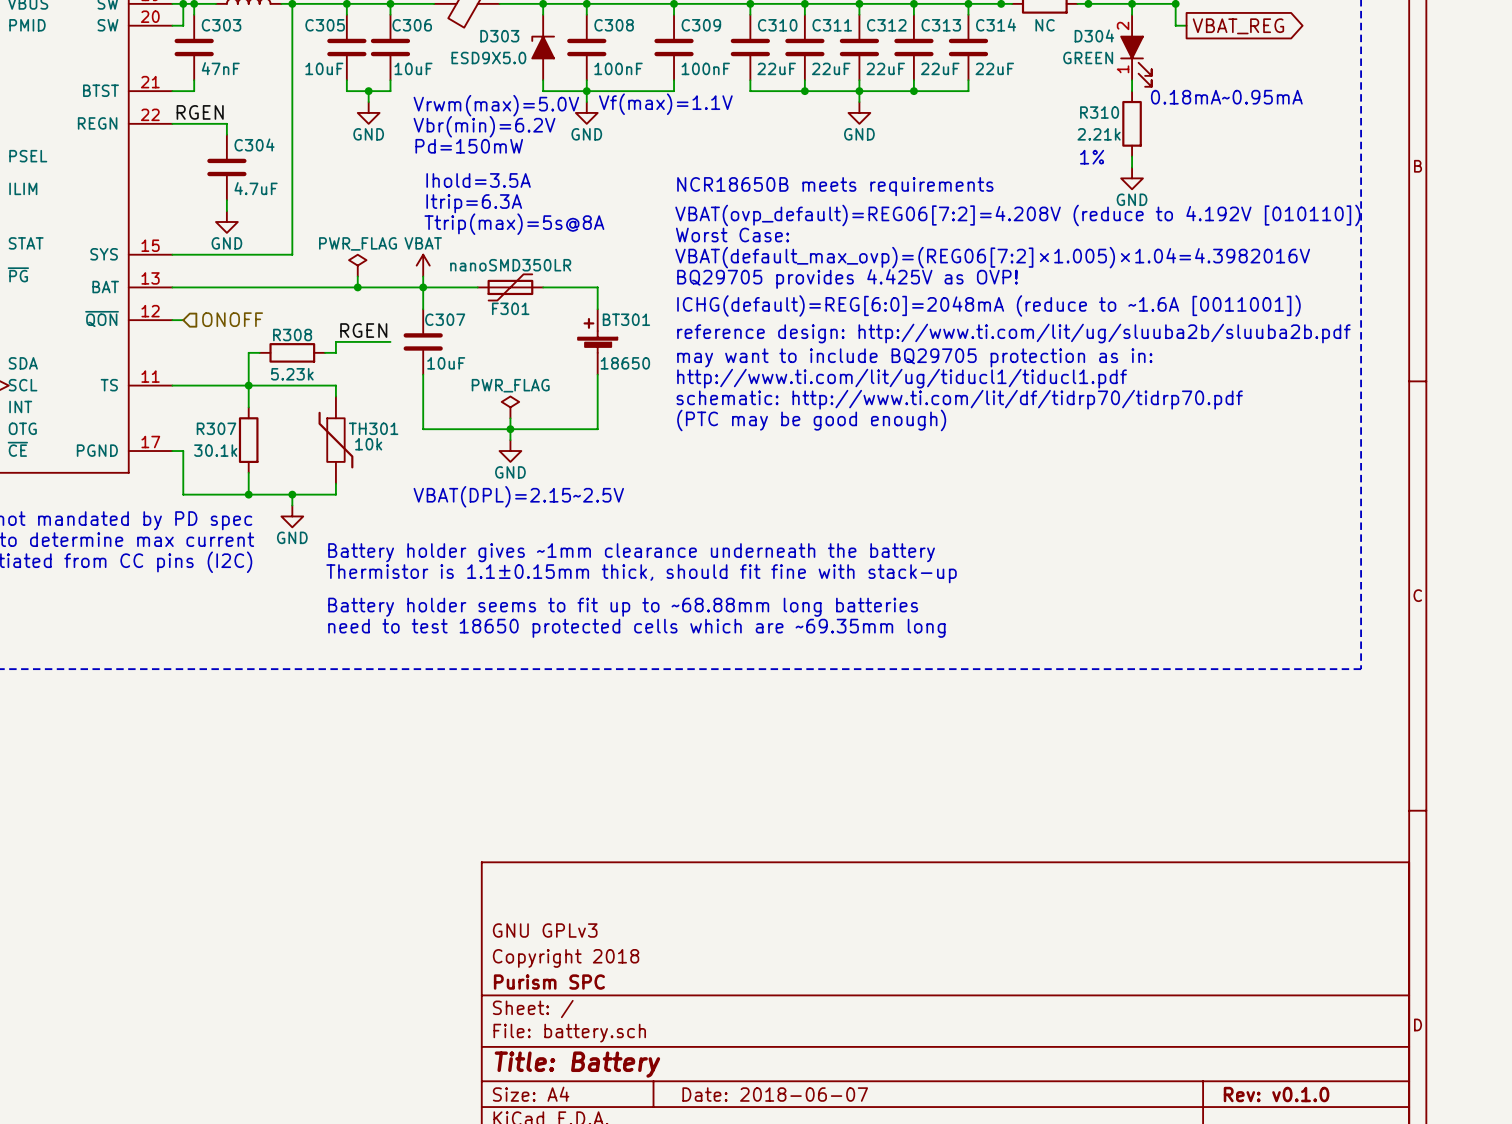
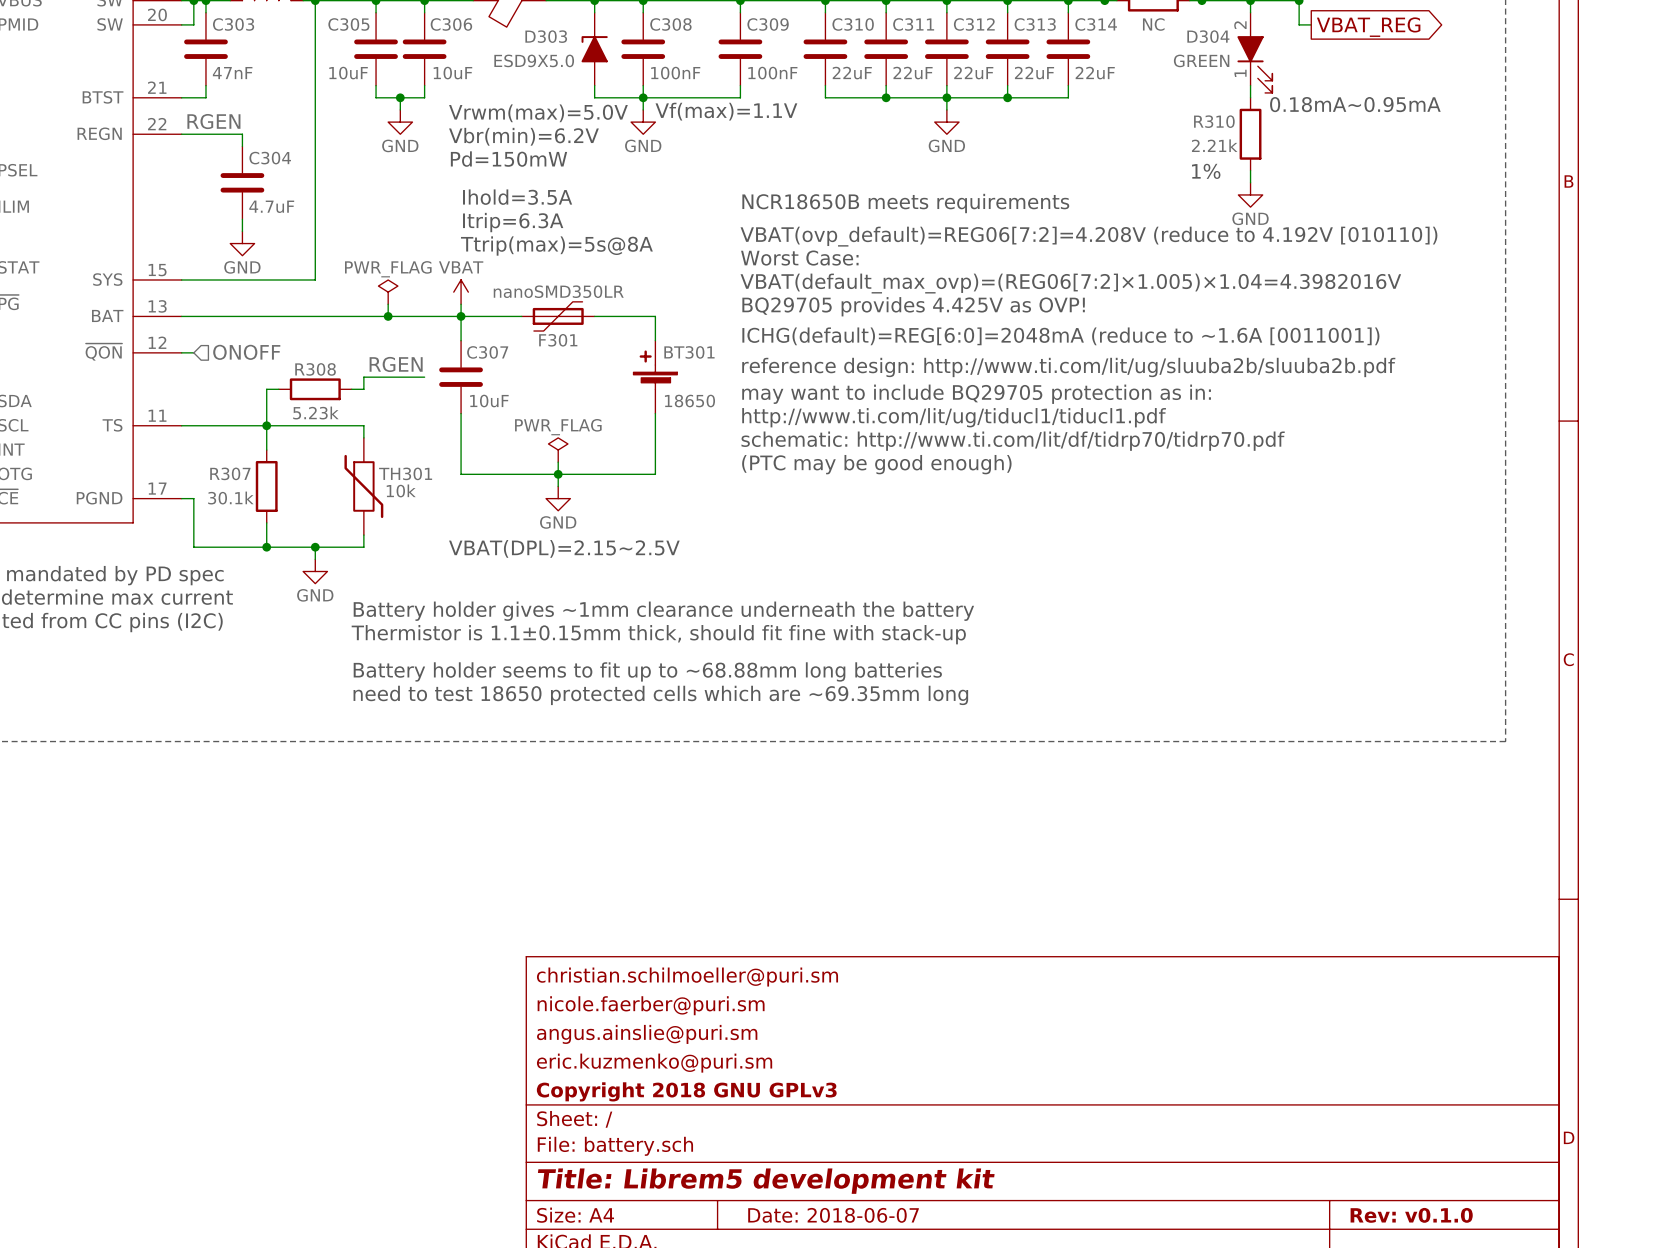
title block: none -> christian.schilmoeller@puri.sm (687, 977)
title block: none -> nicole.faerber@puri.sm (651, 1005)
title block: GNU GPLv3 (545, 930) -> angus.ainslie@puri.sm (647, 1034)
title block: Copyright 2018 (566, 958) -> eric.kuzmenko@puri.sm (654, 1063)
title block: Purism SPC (549, 982) -> Copyright 2018 GNU GPLv3 (686, 1091)
title block: Title: Battery (577, 1064) -> Title: Librem5 development kit (766, 1181)

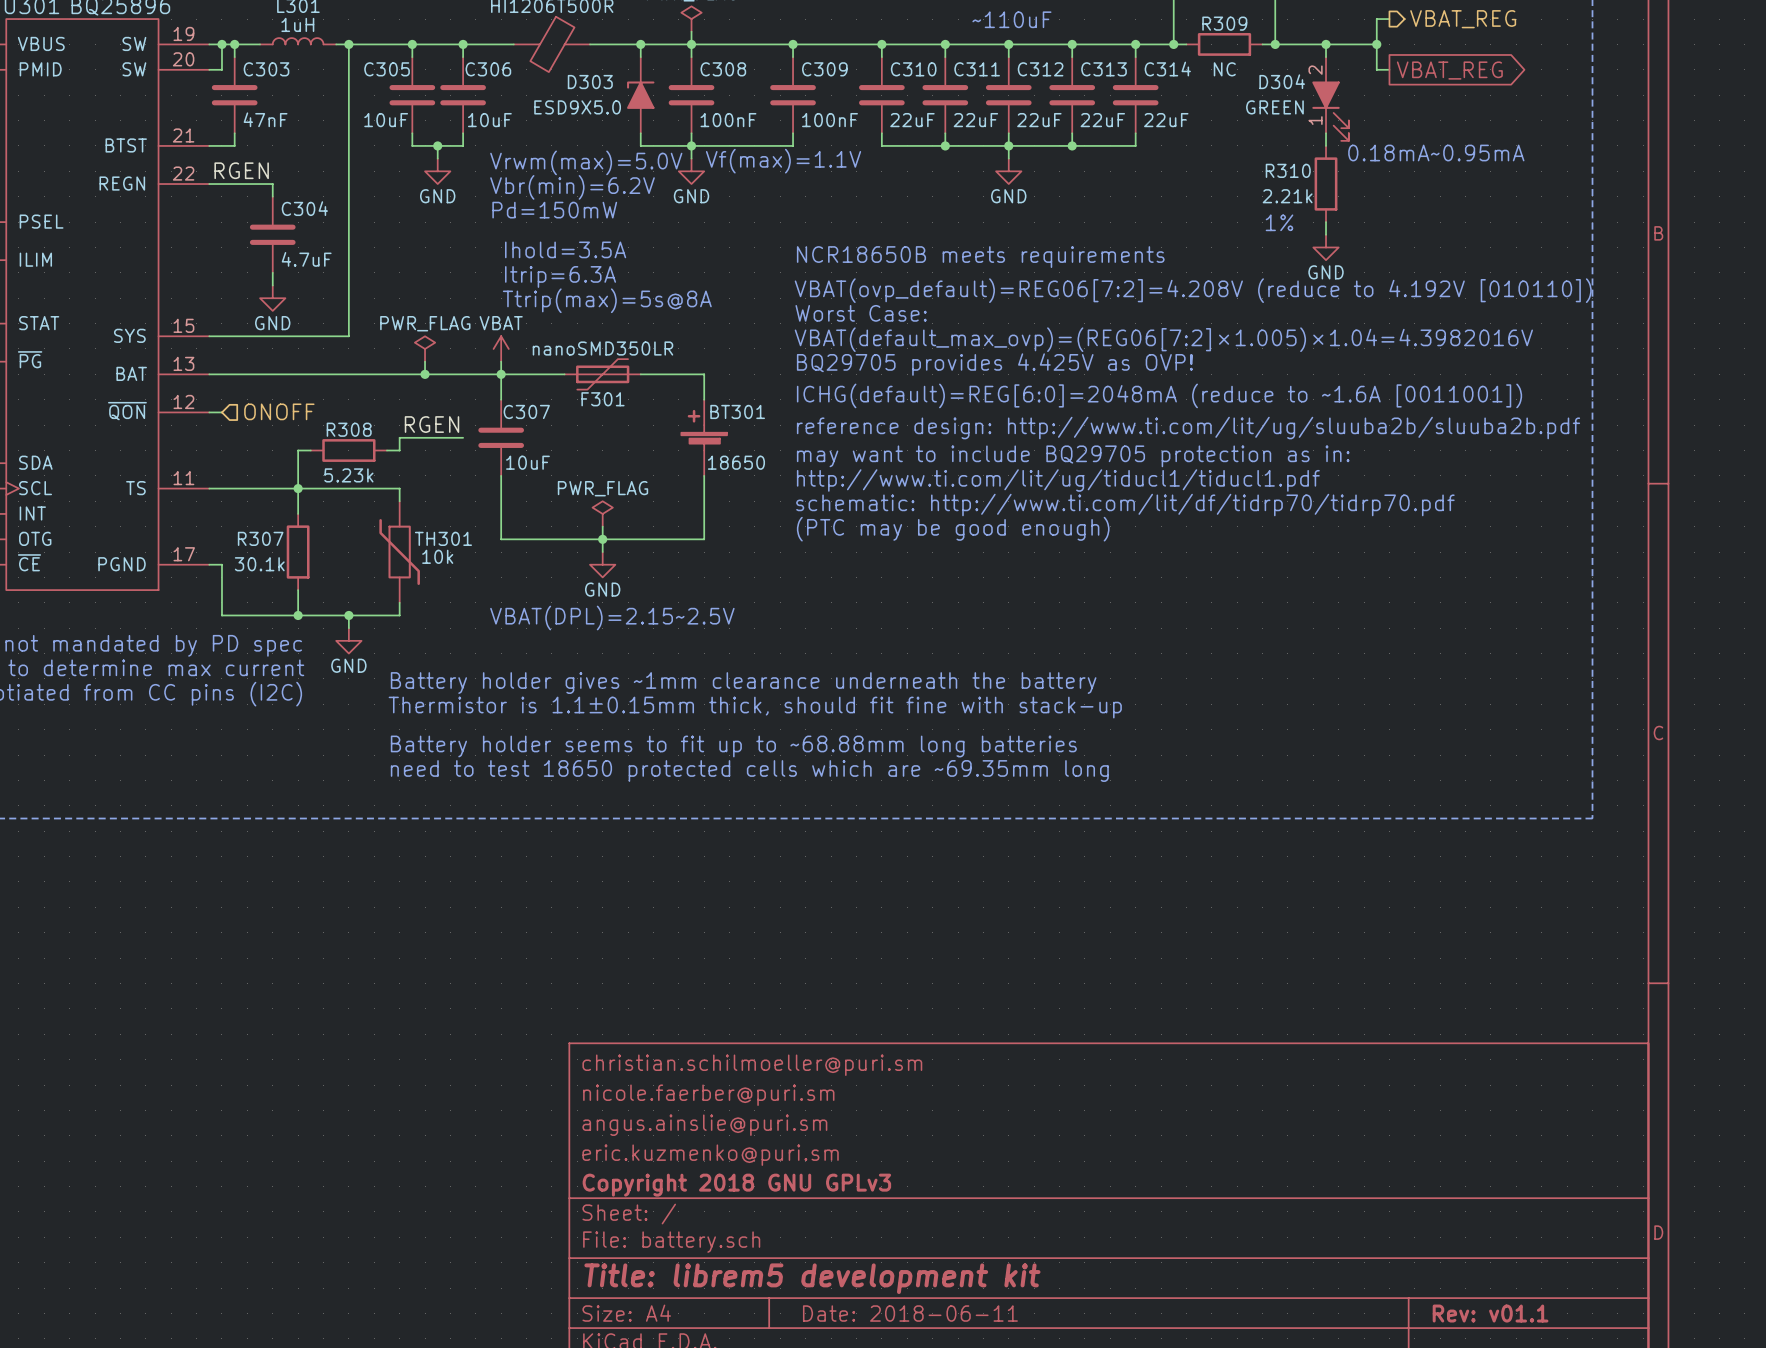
title block: Title: Librem5 development kit (766, 1181) -> Title: librem5 development kit (812, 1278)
title block: Date: 2018-06-07 (833, 1215) -> Date: 2018-06-11 (910, 1313)
title block: Rev: v0.1.0 (1411, 1215) -> Rev: v01.1 (1490, 1313)

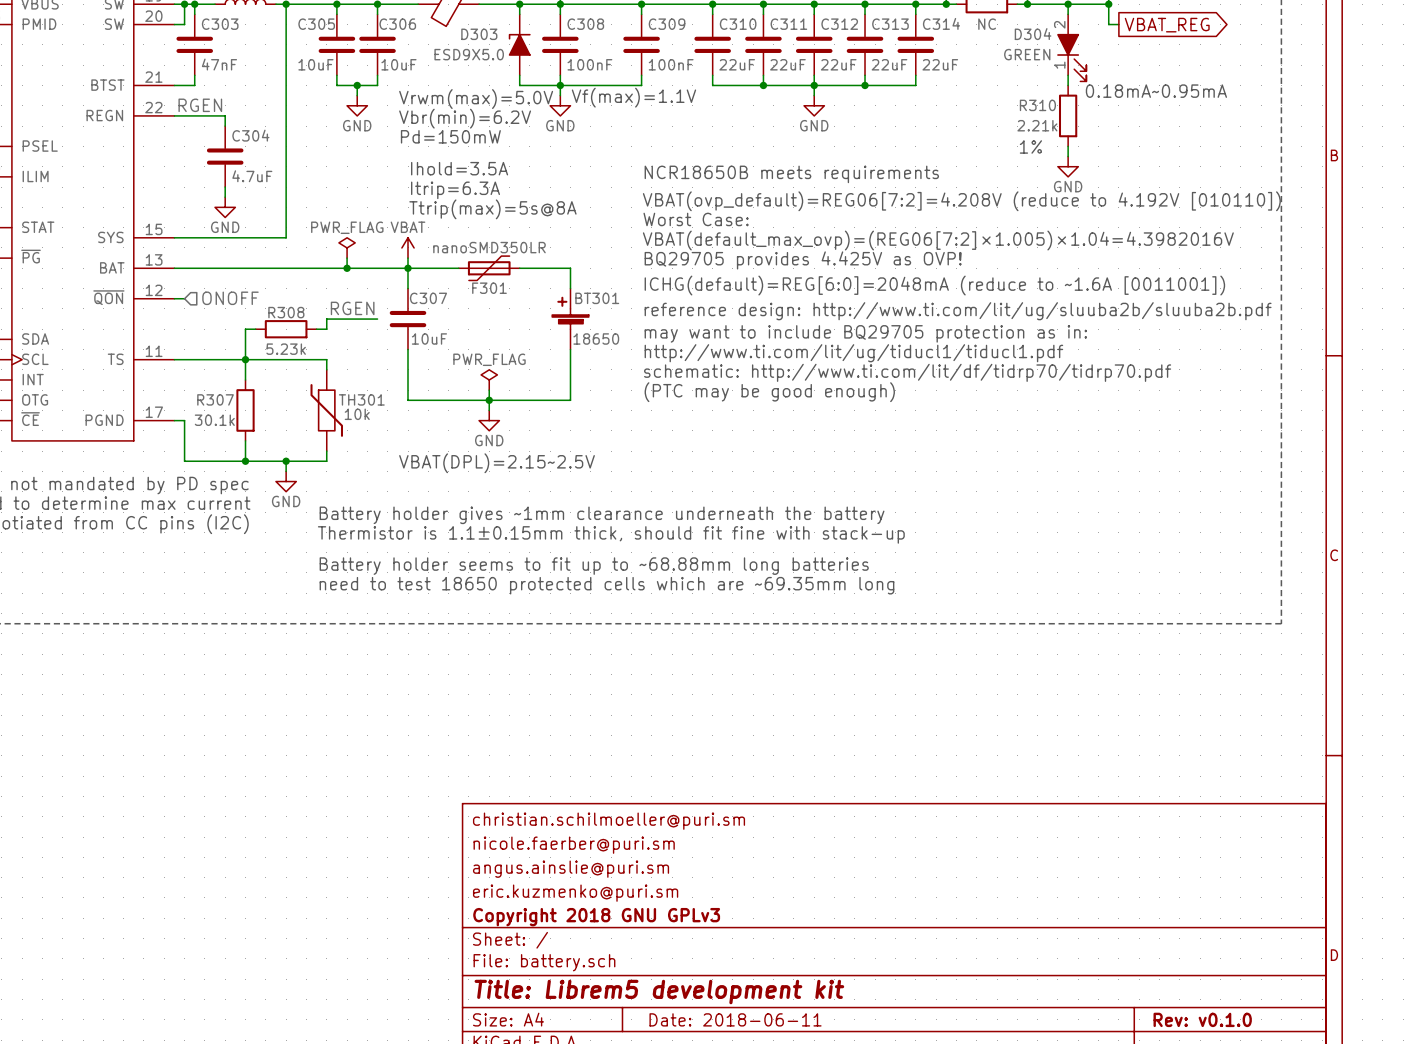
title block: Title: librem5 development kit (812, 1278) -> Title: Librem5 development kit (659, 992)
title block: Rev: v01.1 (1490, 1313) -> Rev: v0.1.0 (1202, 1019)

